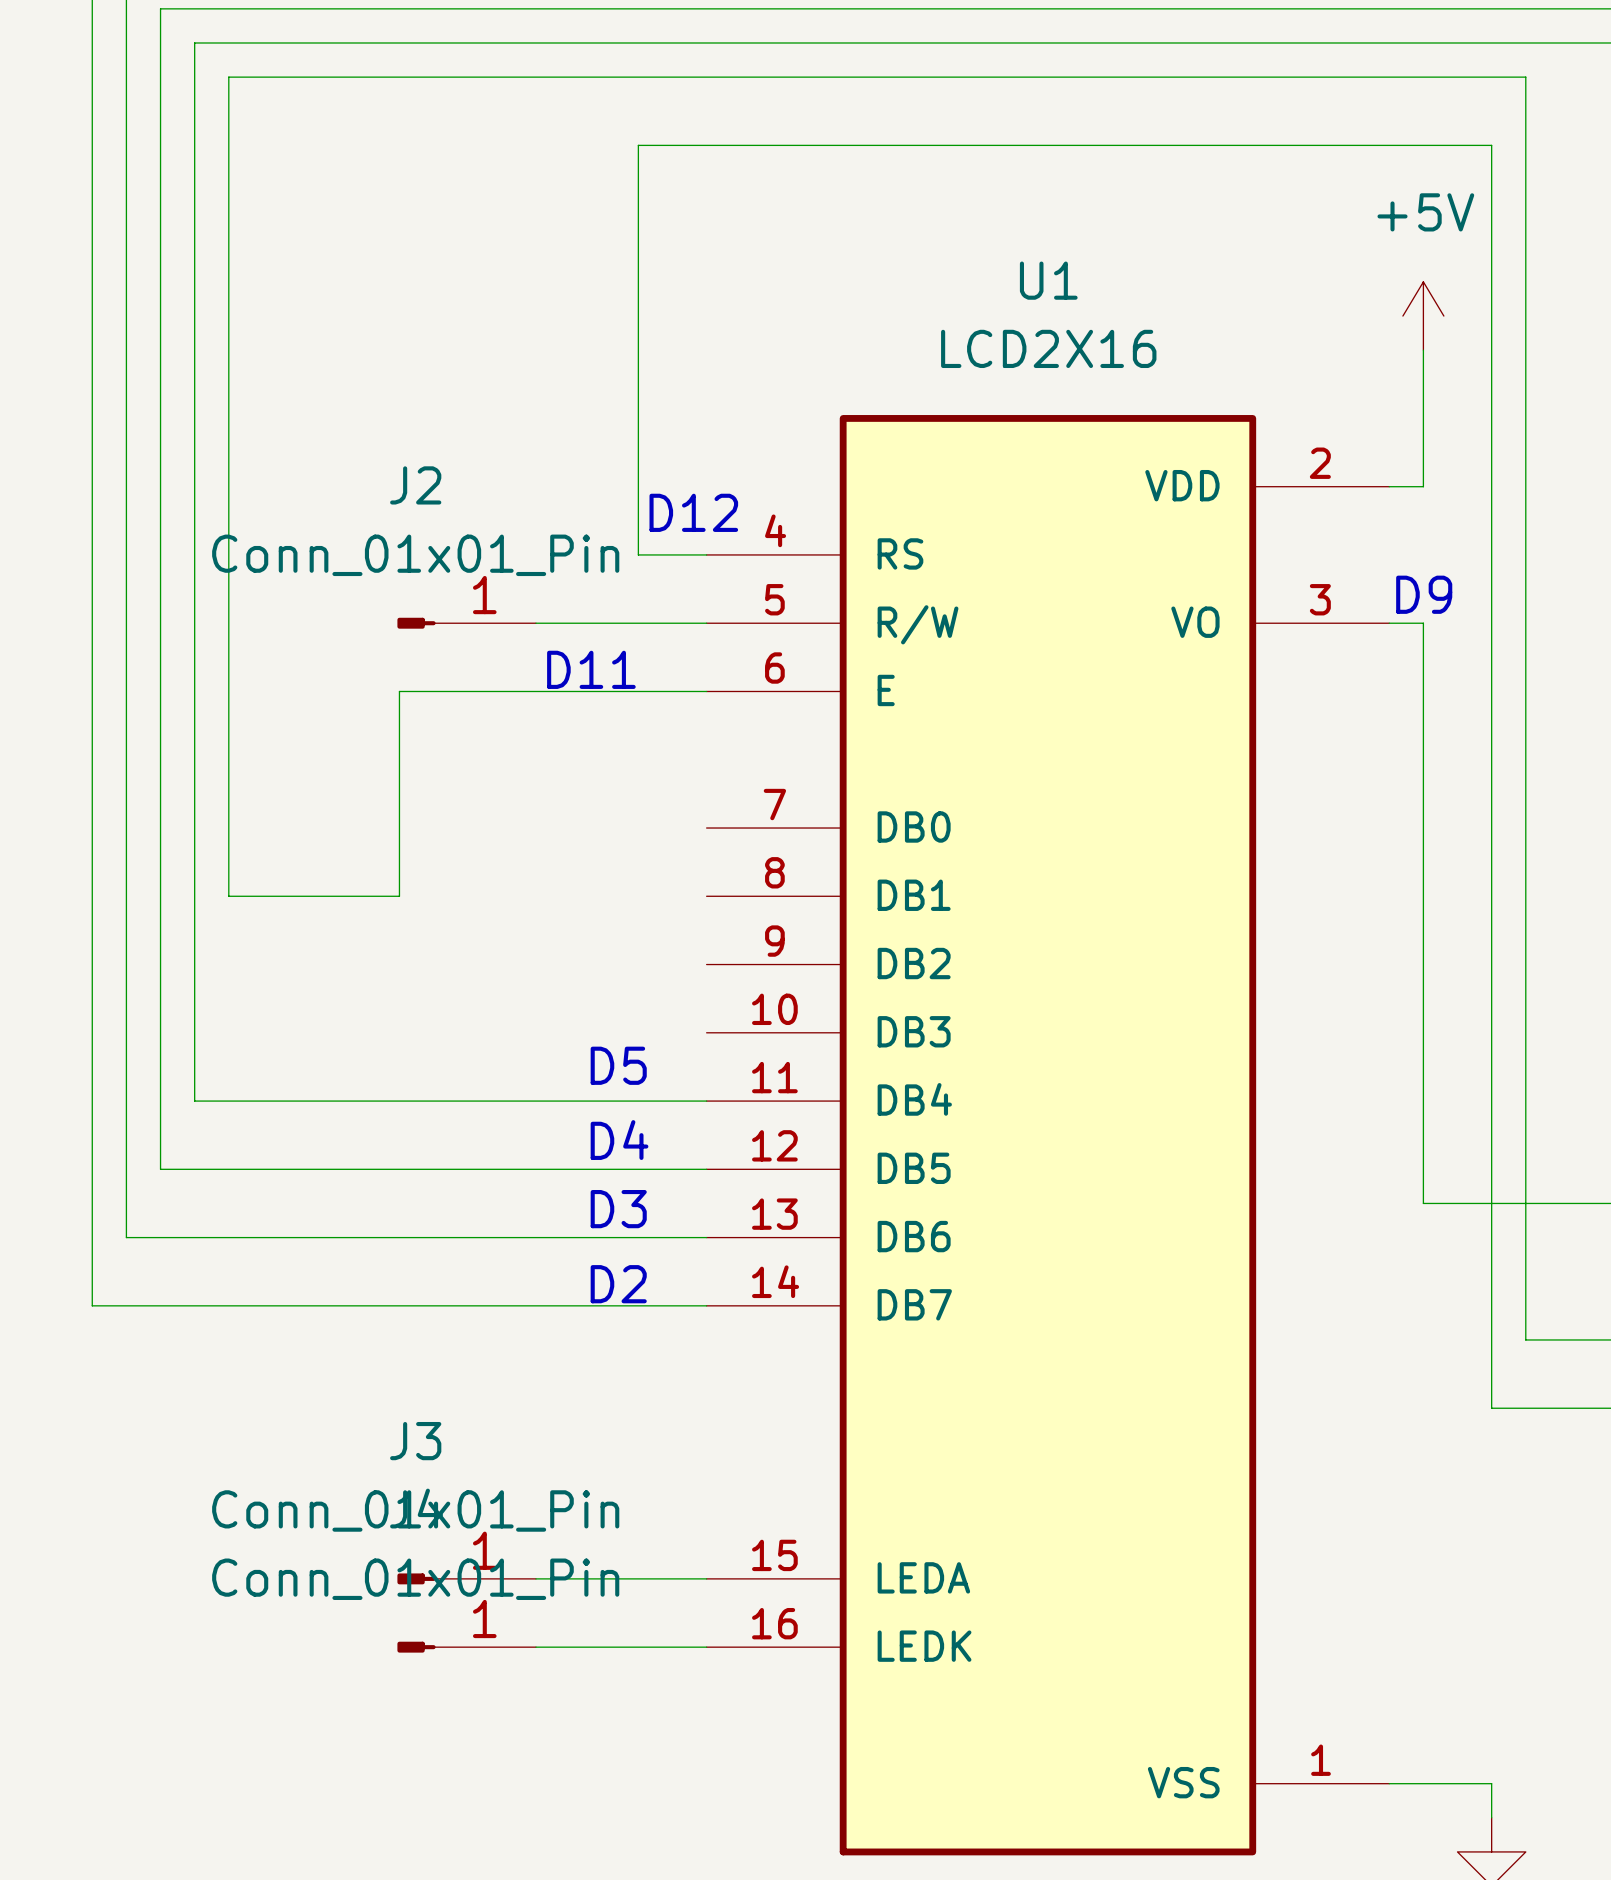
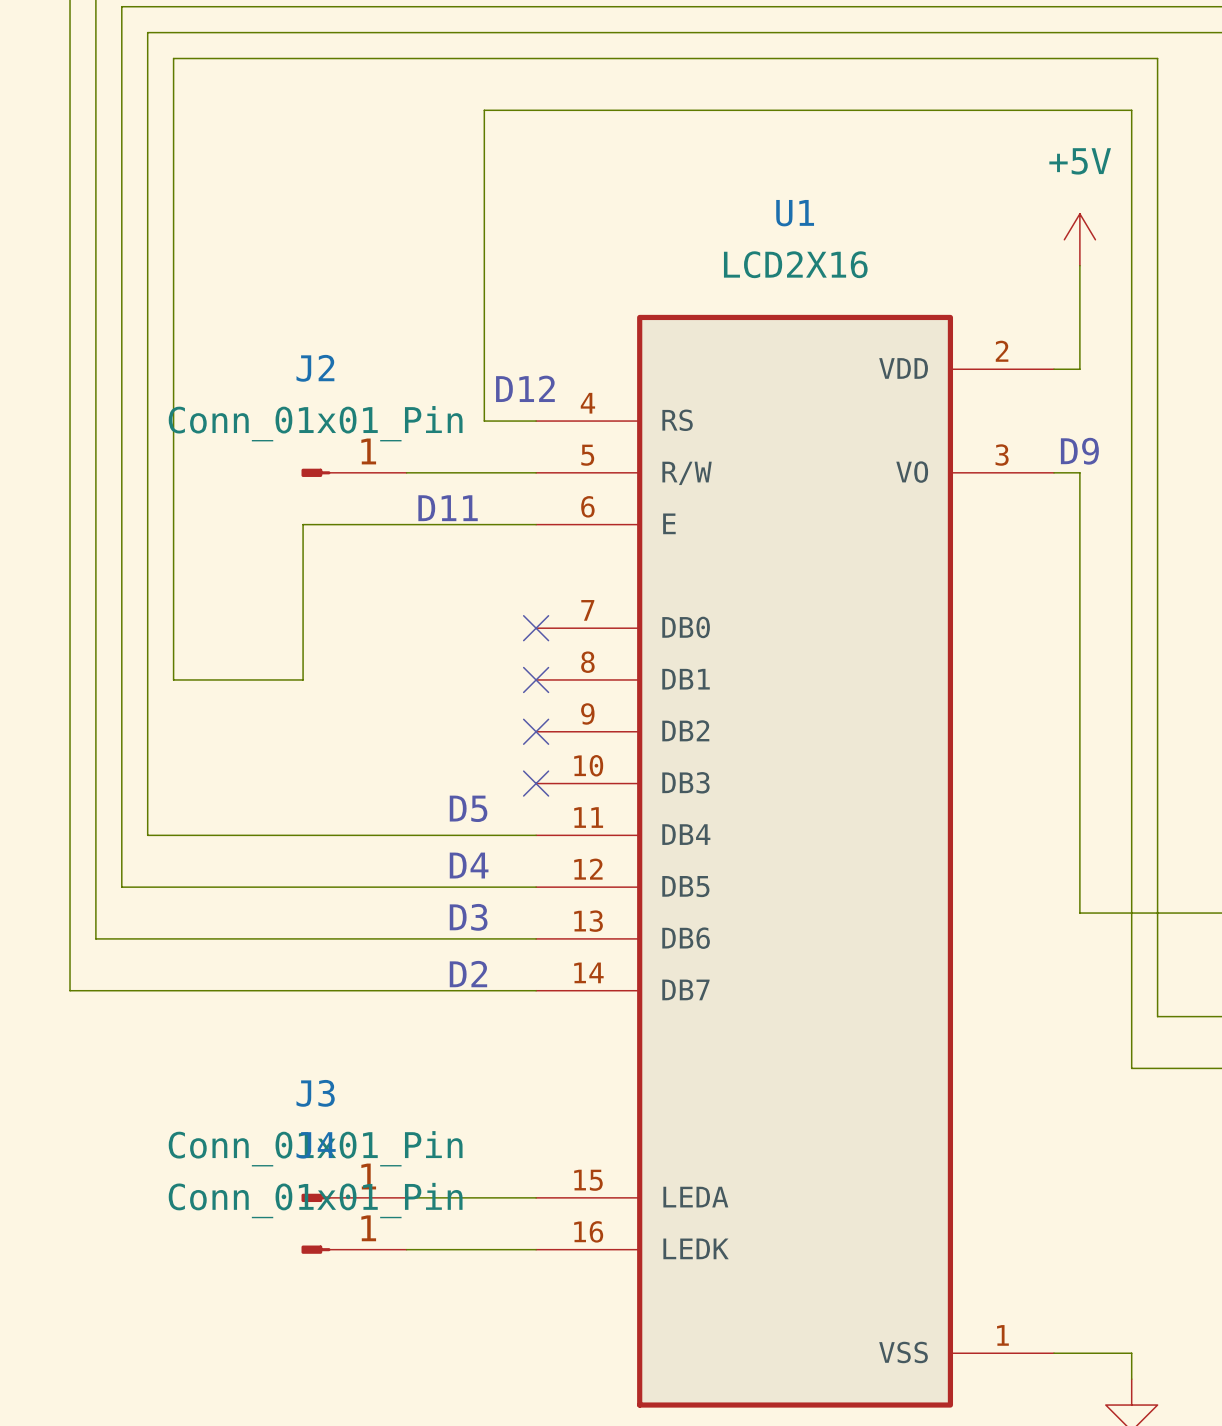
no-connect mark: none -> (536, 628)
no-connect mark: none -> (536, 679)
no-connect mark: none -> (536, 731)
no-connect mark: none -> (536, 783)

